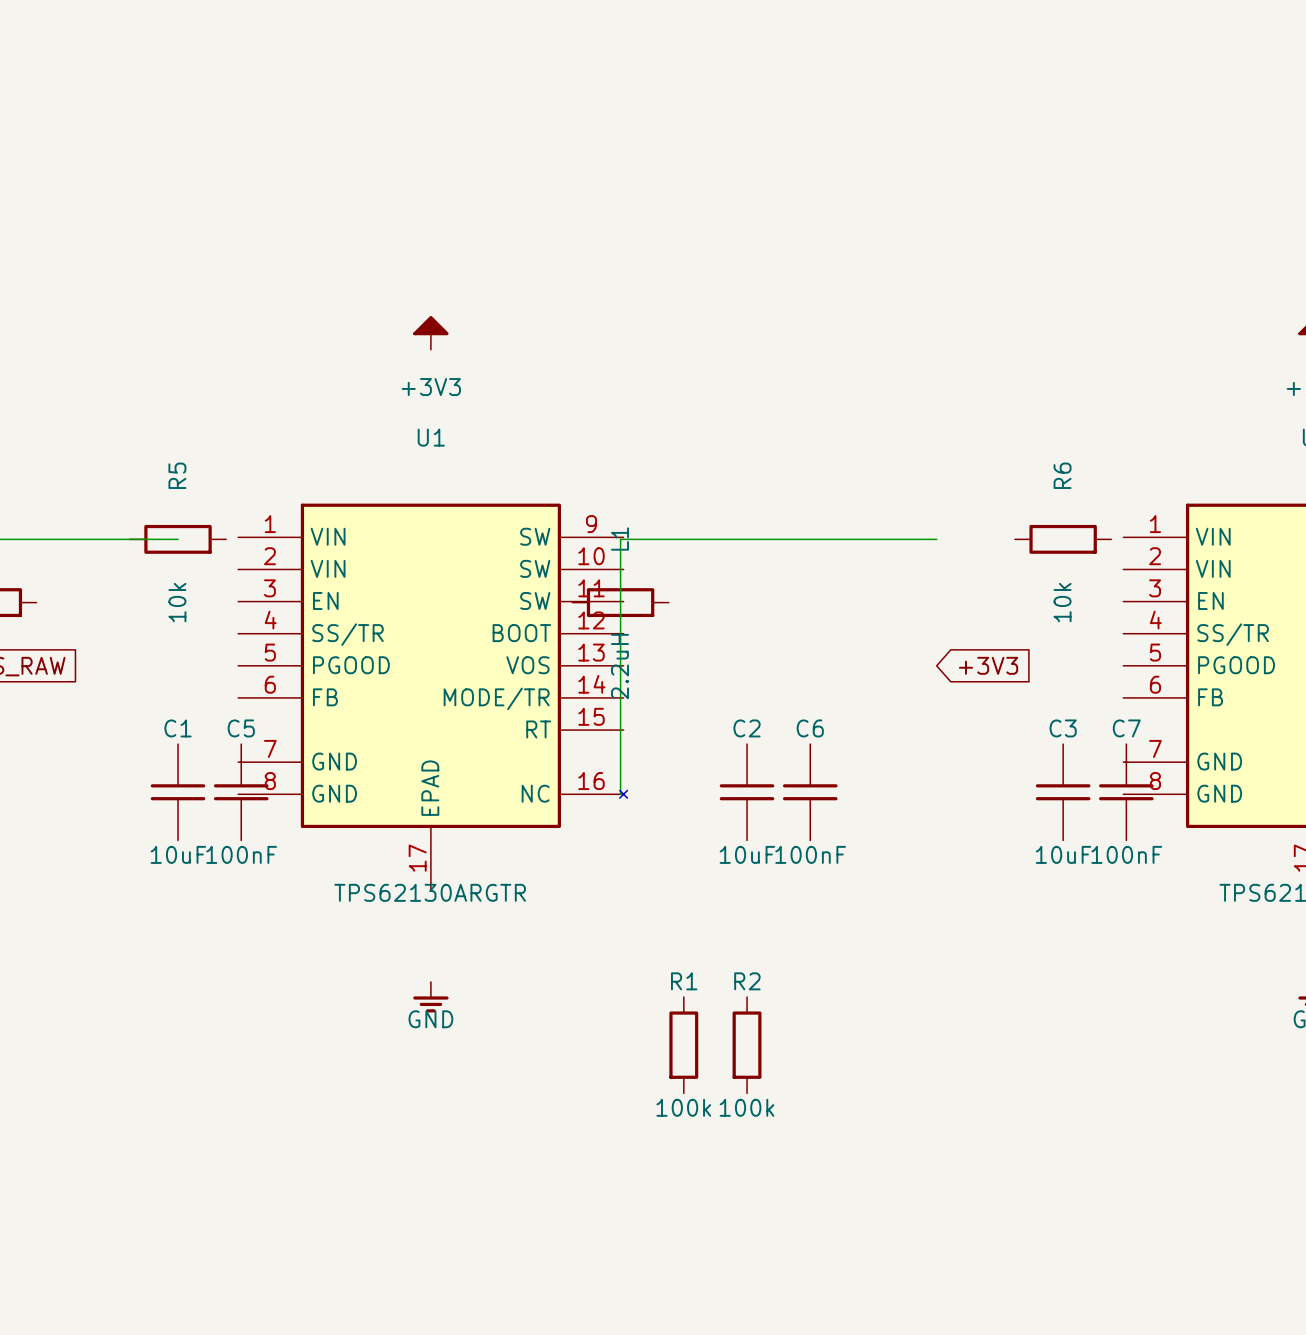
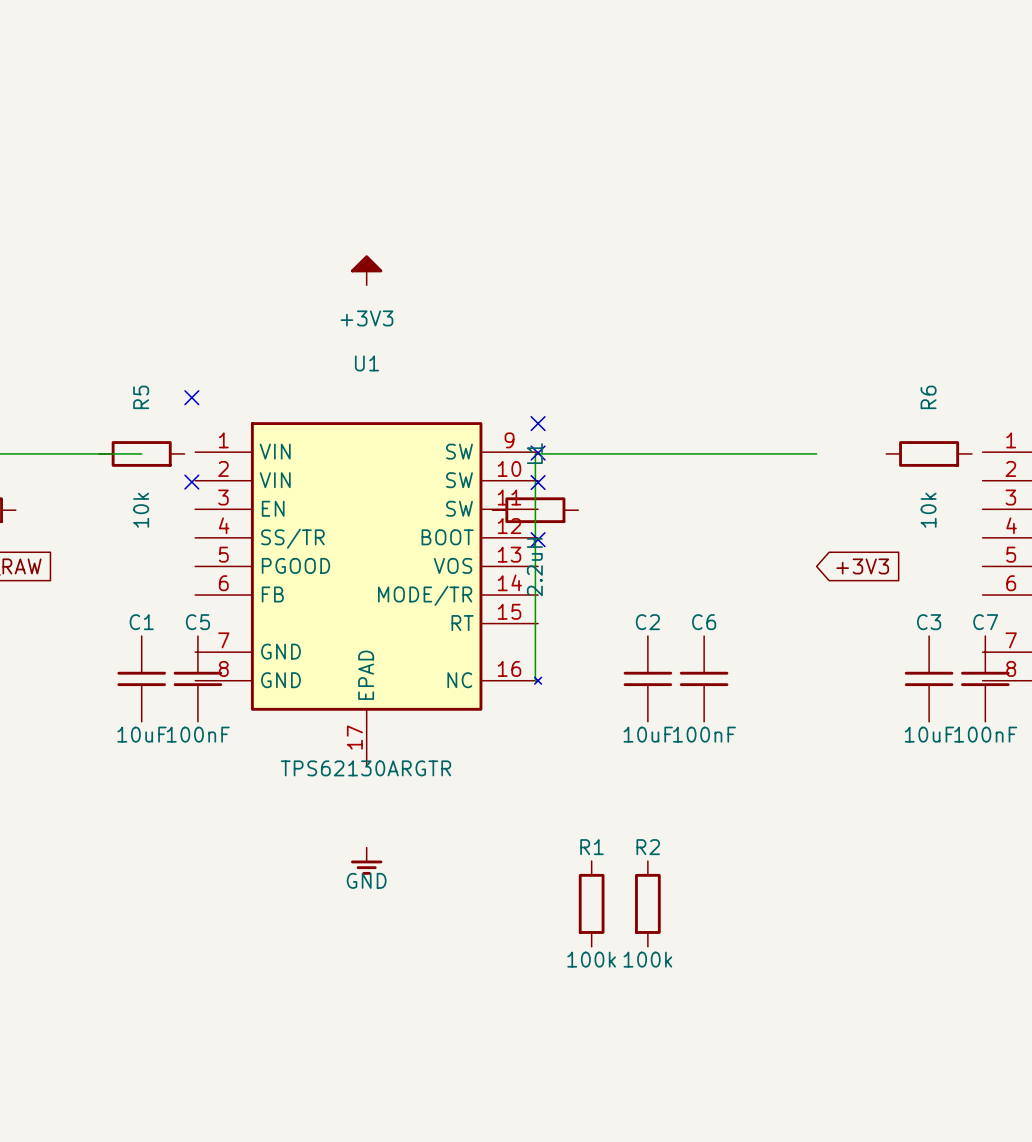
no-connect mark: none -> (191, 397)
no-connect mark: none -> (538, 423)
no-connect mark: none -> (538, 453)
no-connect mark: none -> (191, 482)
no-connect mark: none -> (538, 482)
no-connect mark: none -> (538, 539)

